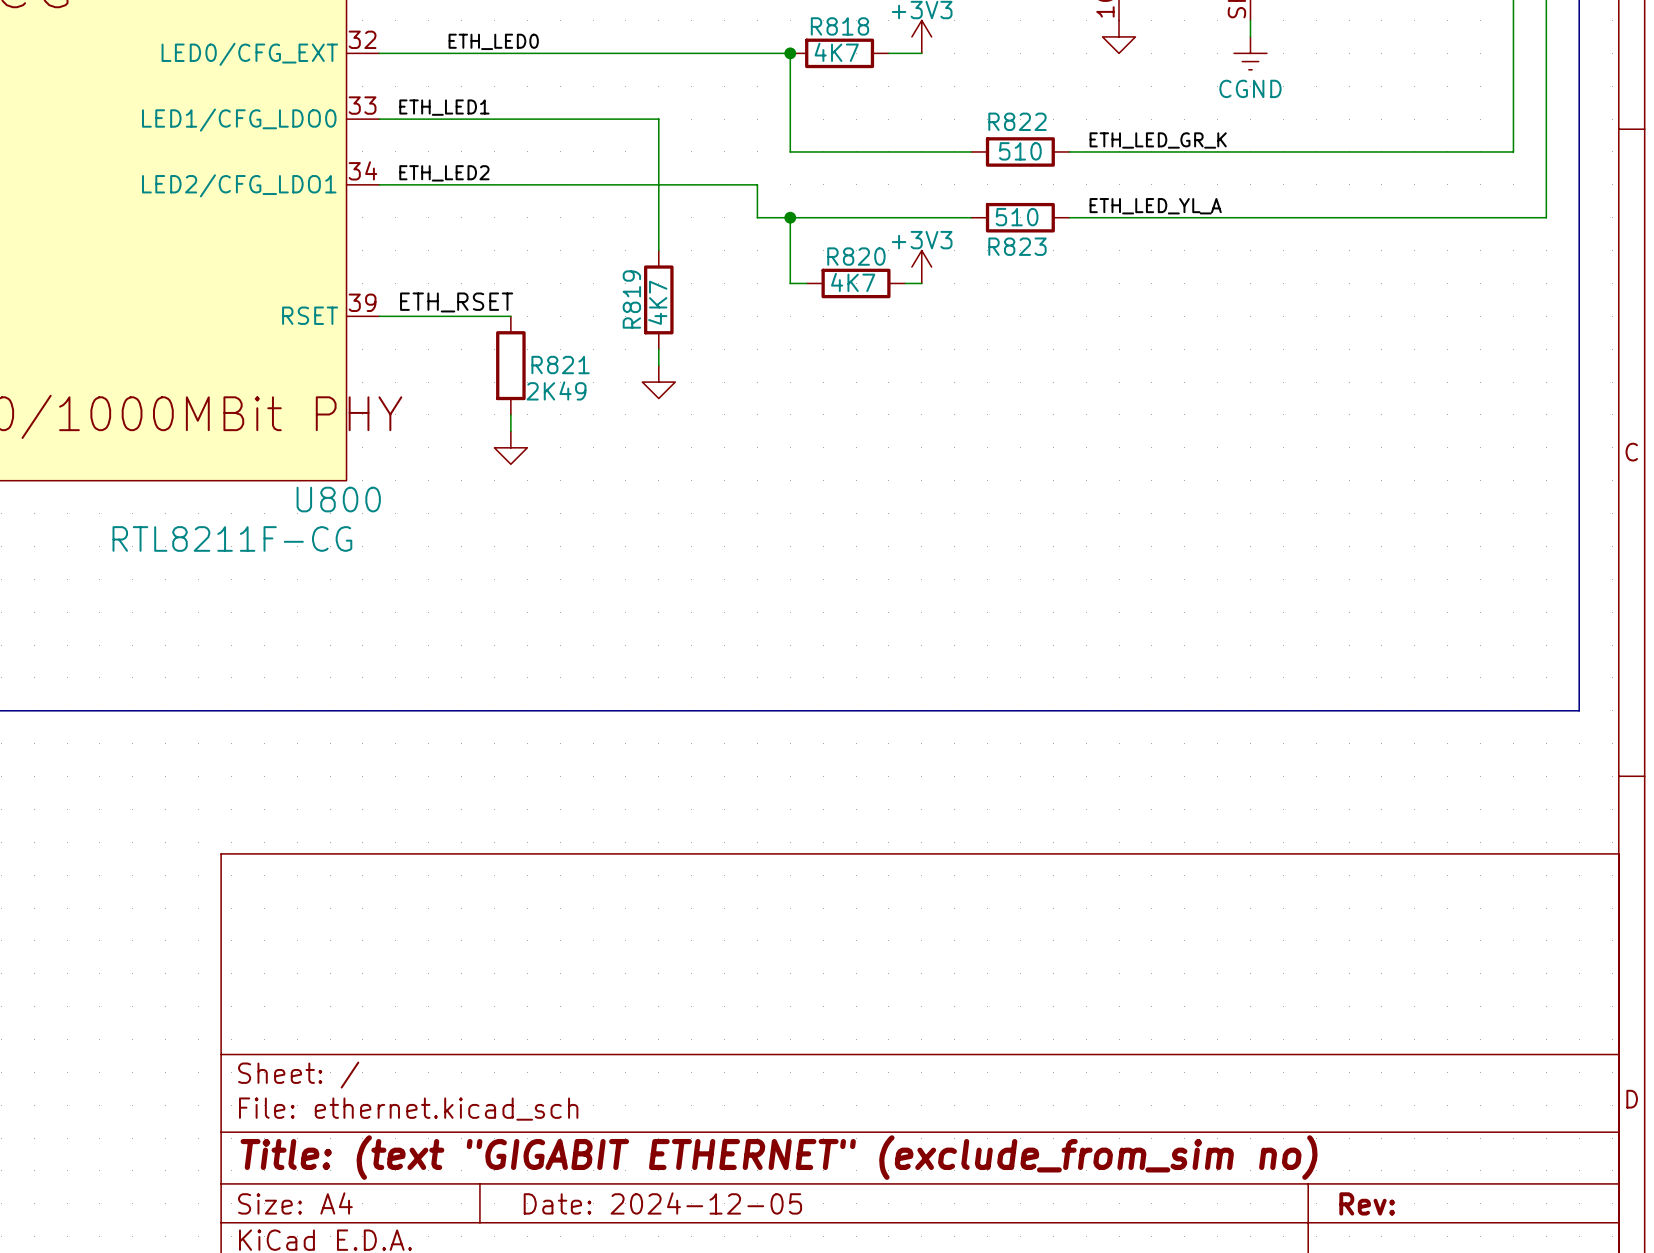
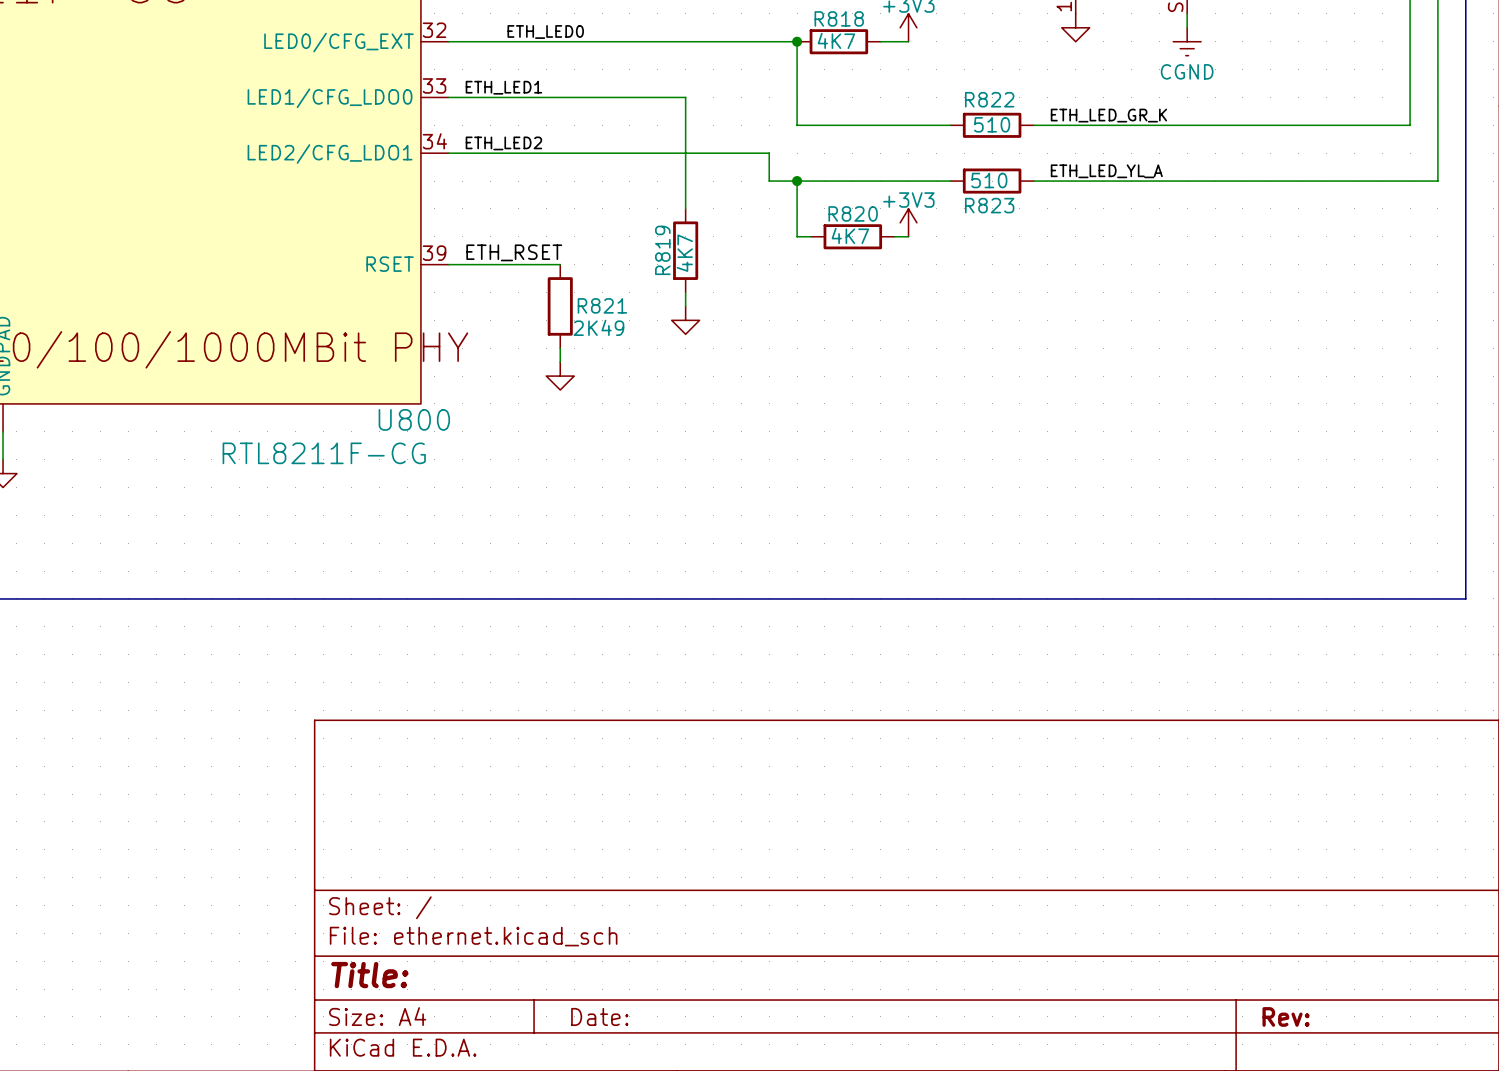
title block: Title: (text "GIGABIT ETHERNET" (exclude_from_sim no) (779, 1157) -> Title: (369, 975)
title block: Date: 2024-12-05 (662, 1203) -> Date: (599, 1016)

